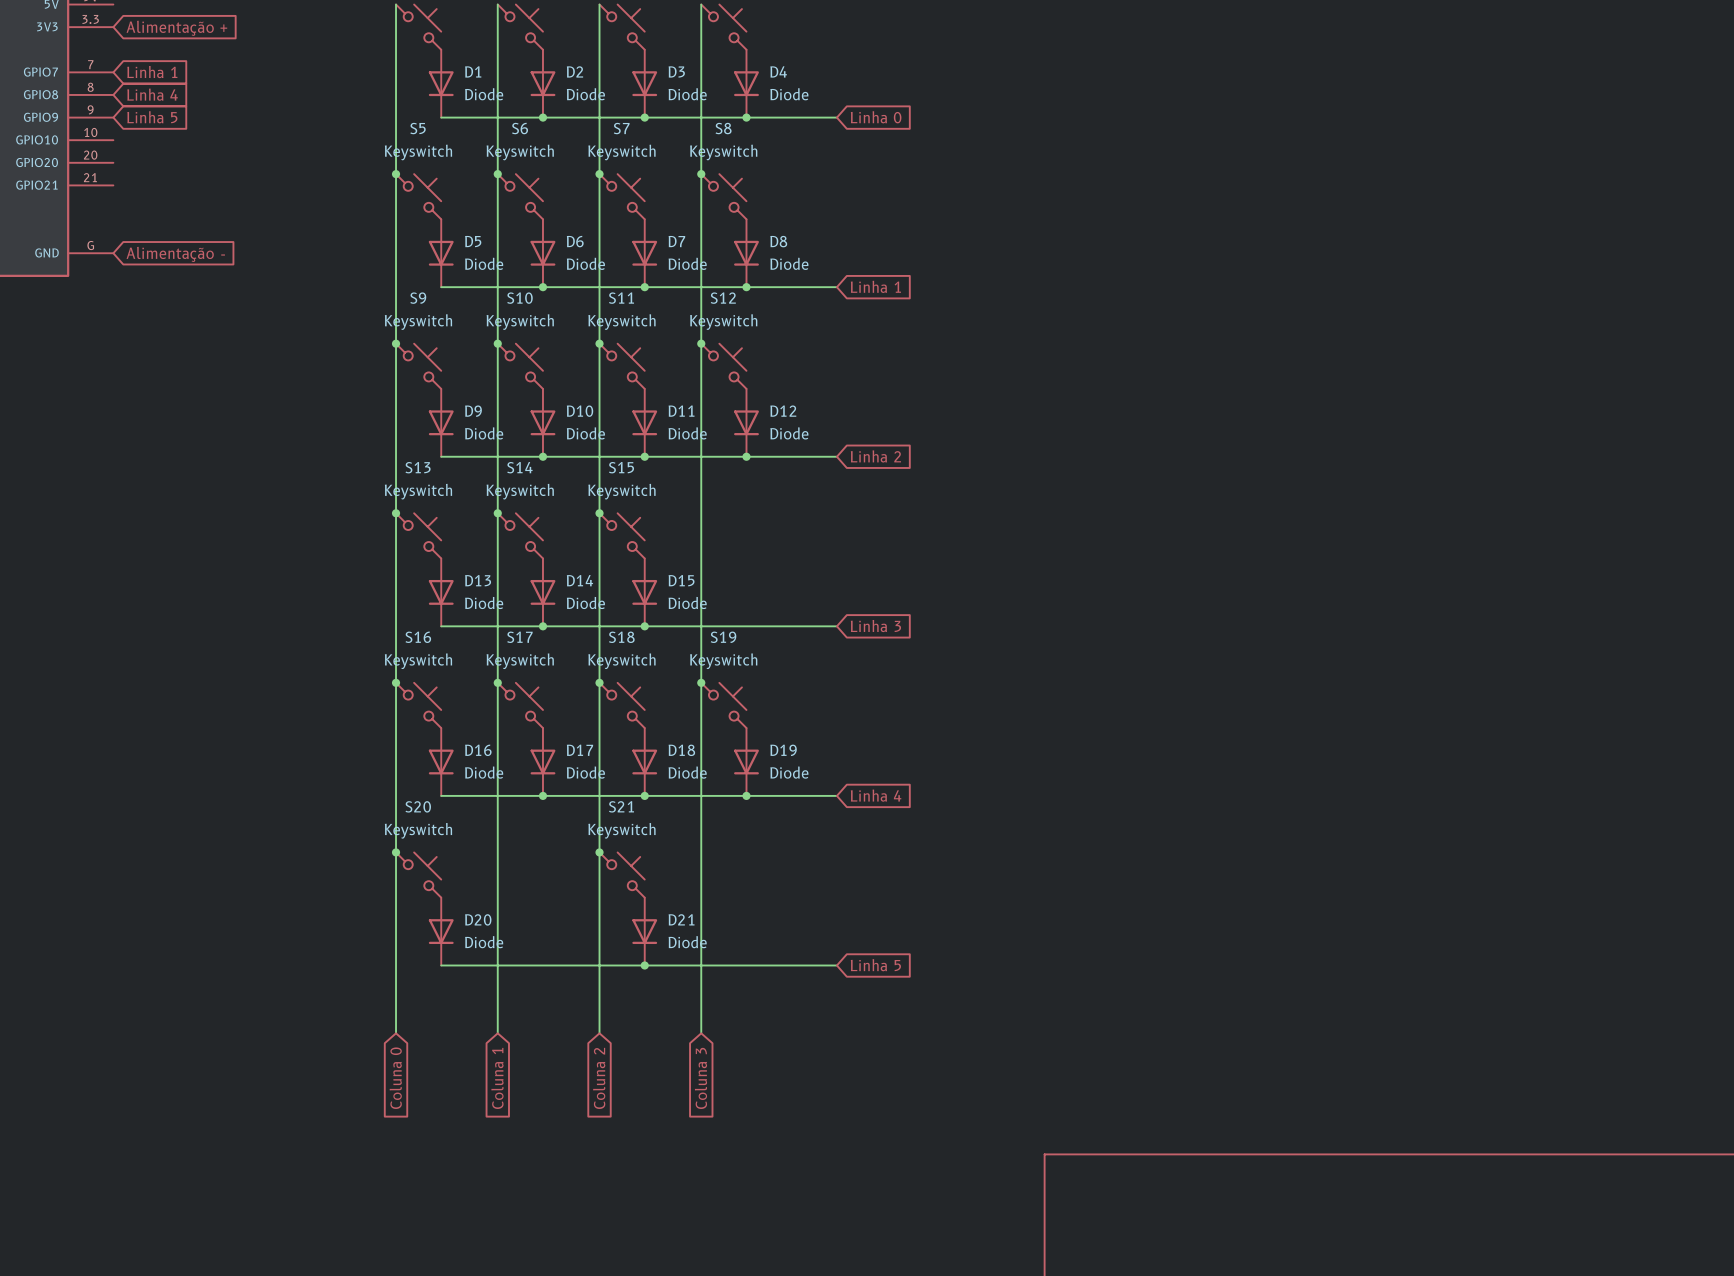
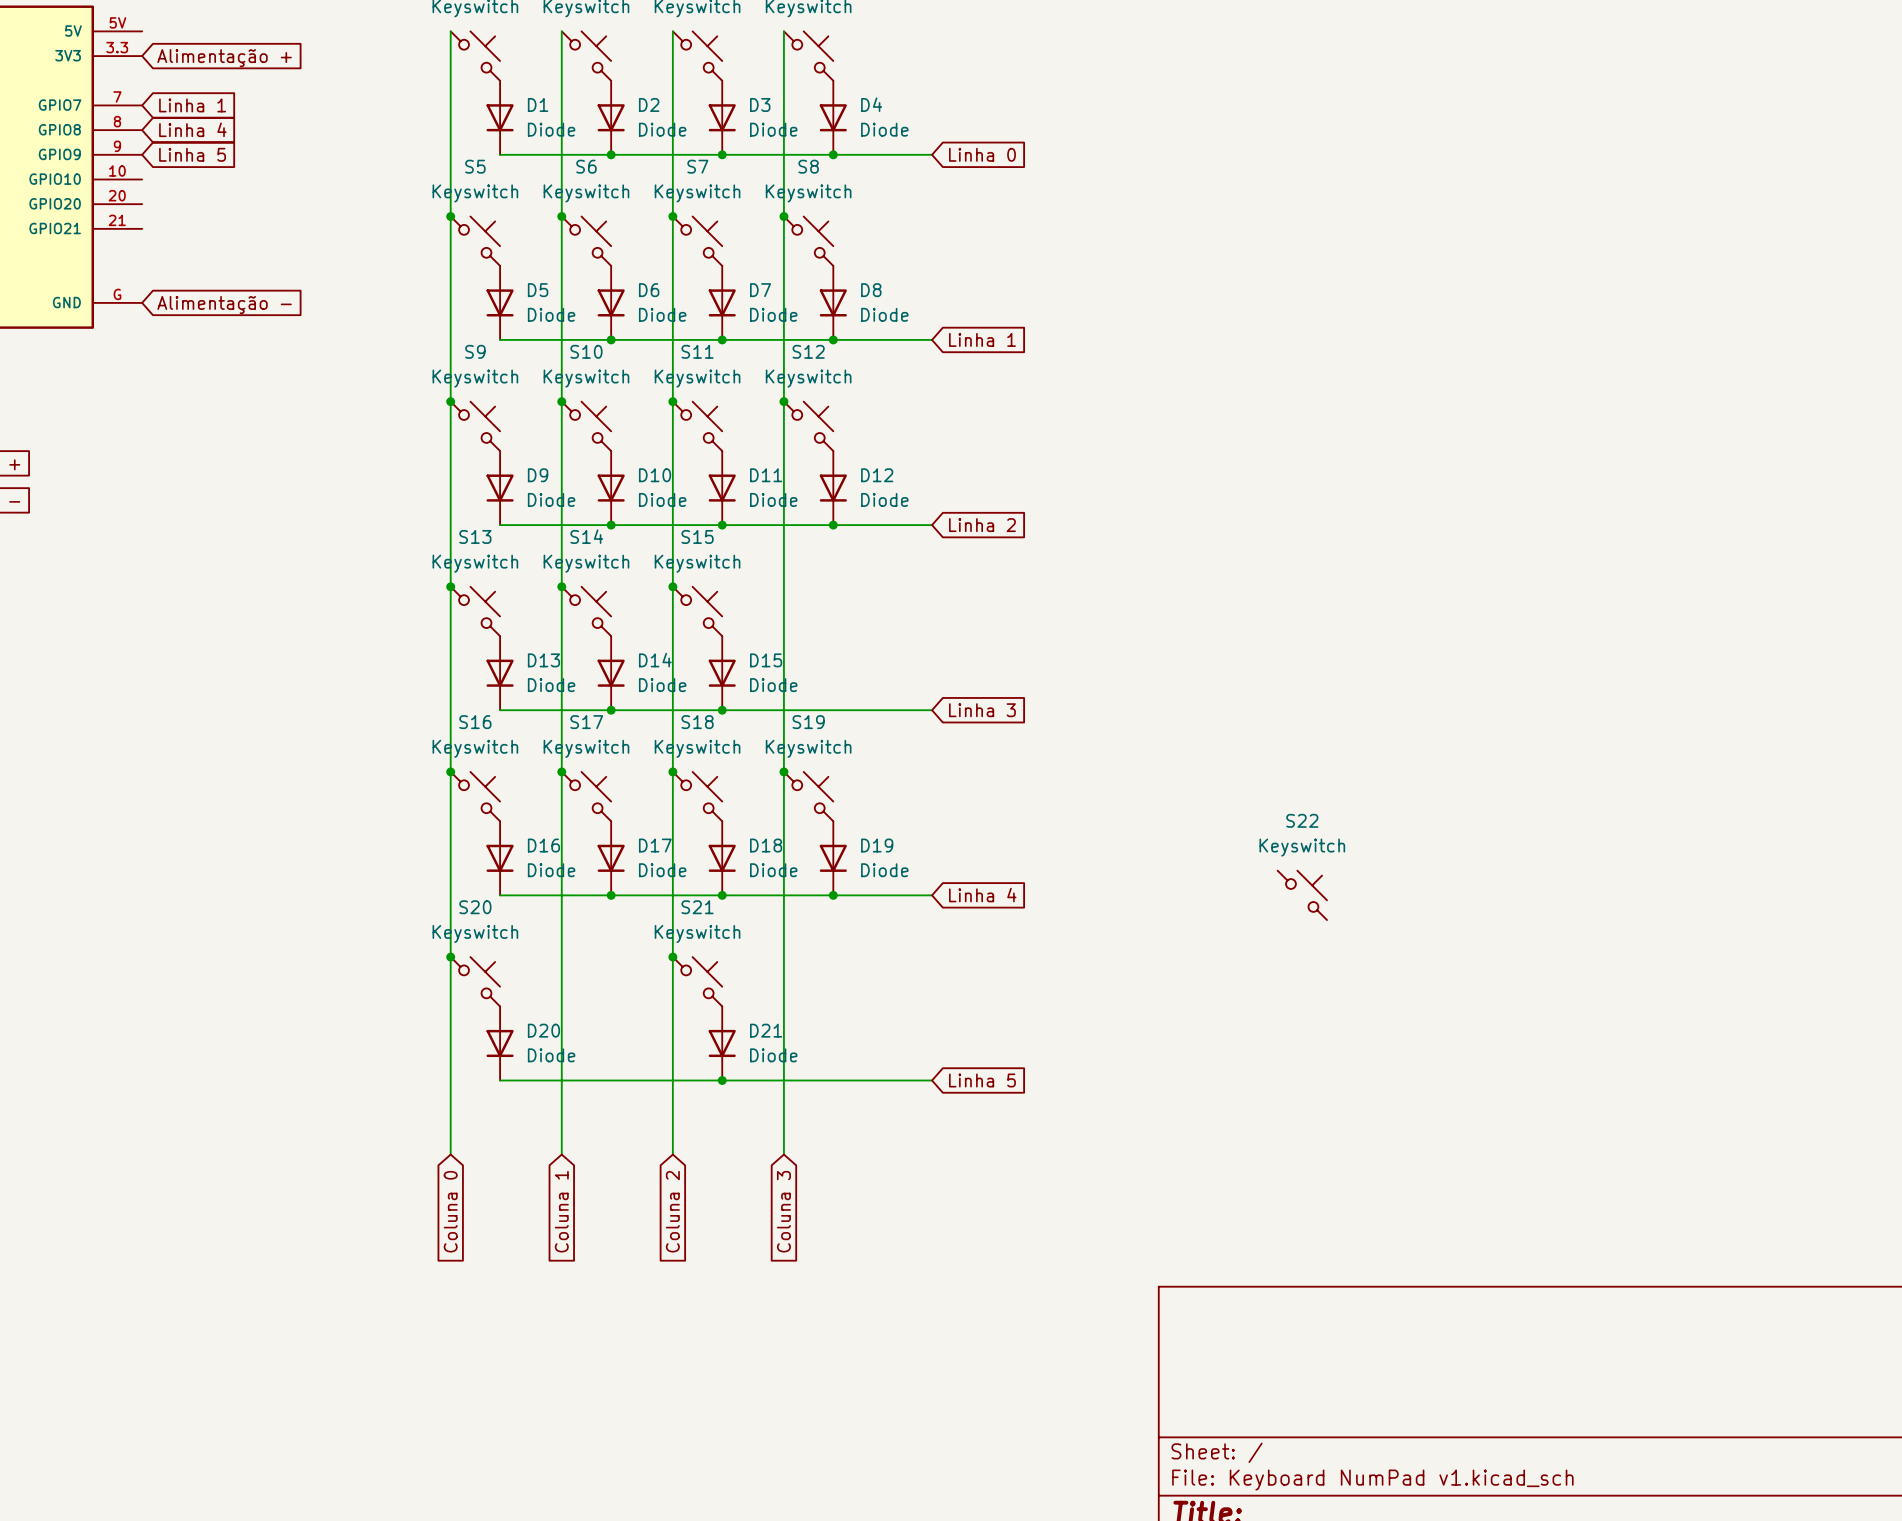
S22: none -> Keyswitch (1302, 895)

